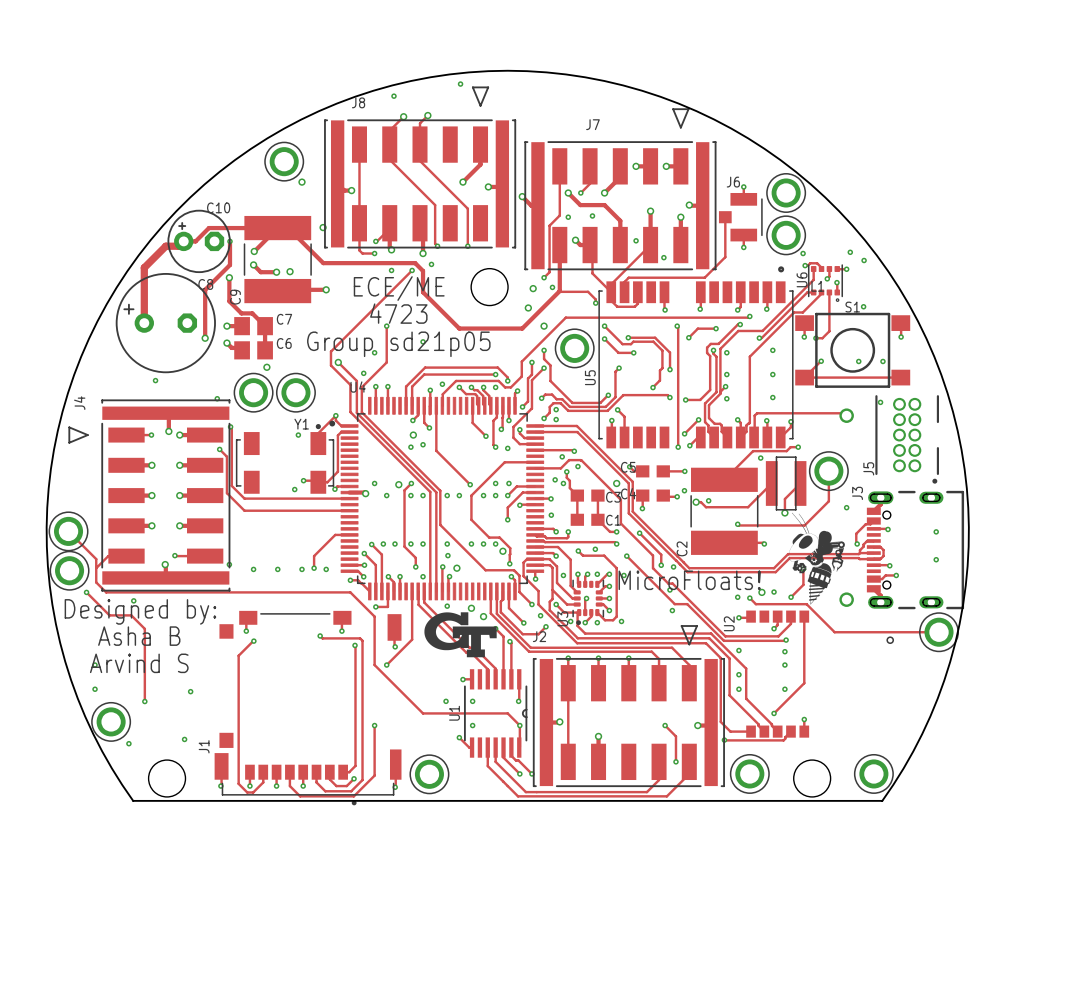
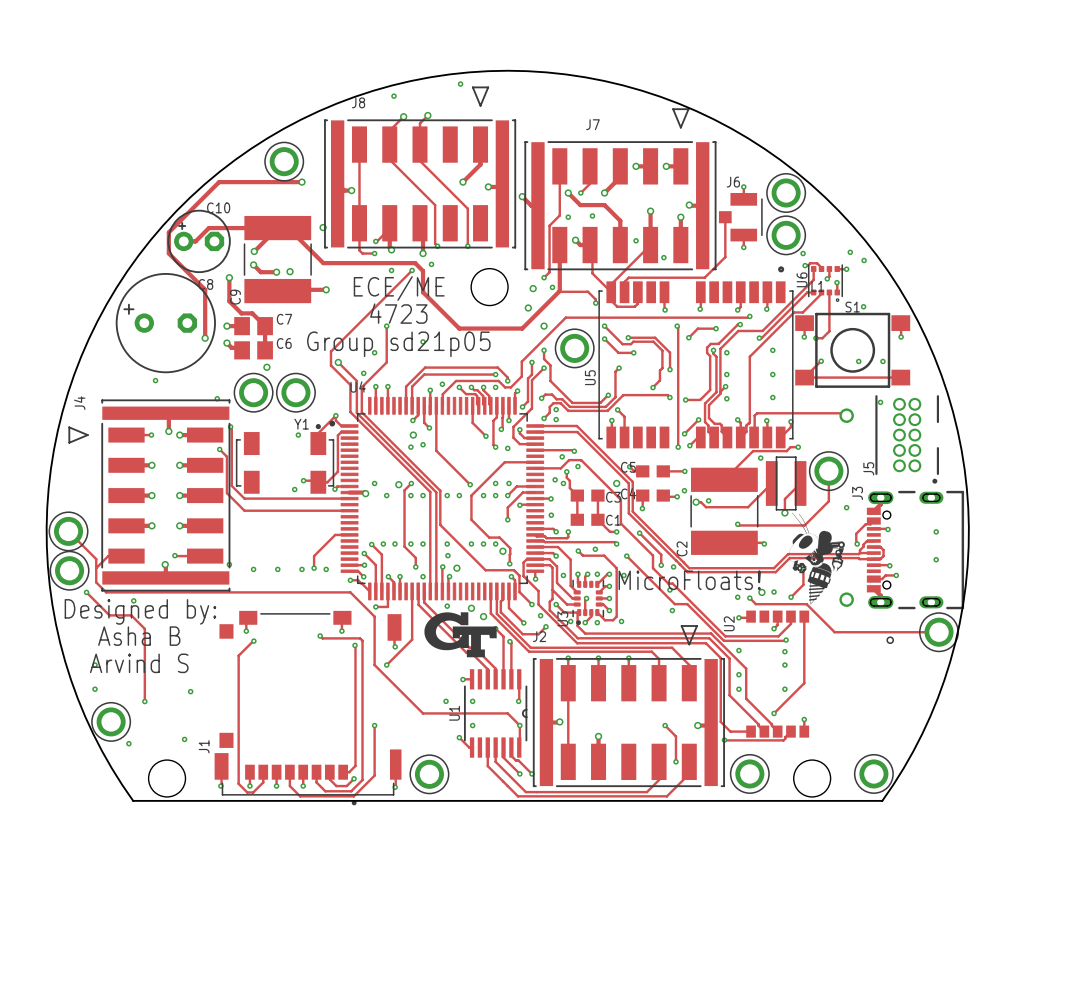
track: (183, 241) (178, 246) (165, 246) (144, 267) (144, 323) -> none
track: (229, 241) (229, 264) (205, 289) -> (302, 182) (219, 182) (168, 232) (168, 253) (205, 289)
via: (229, 241) -> none

